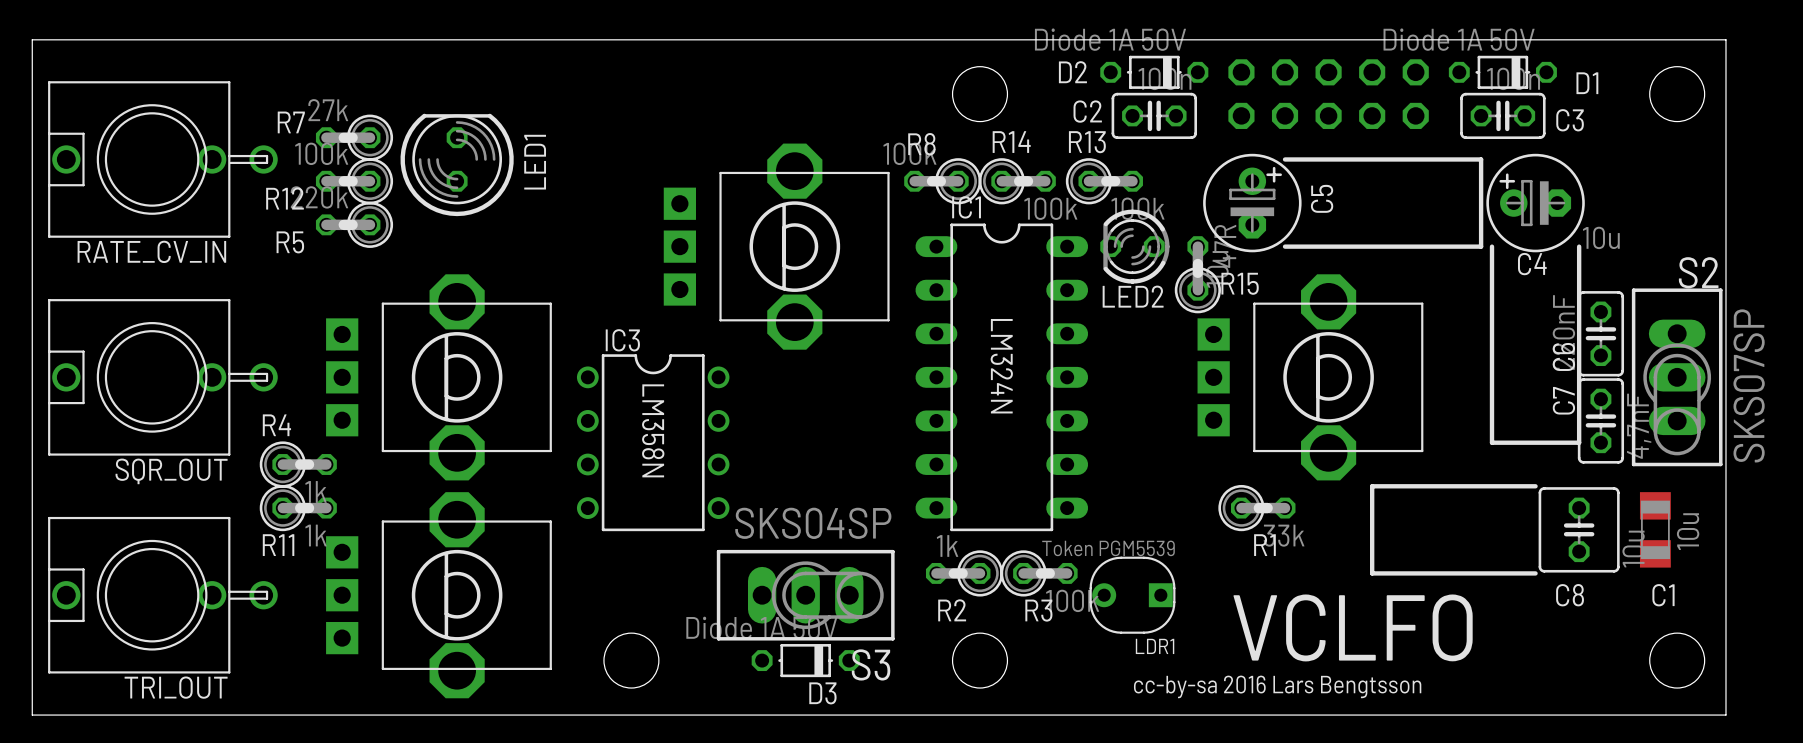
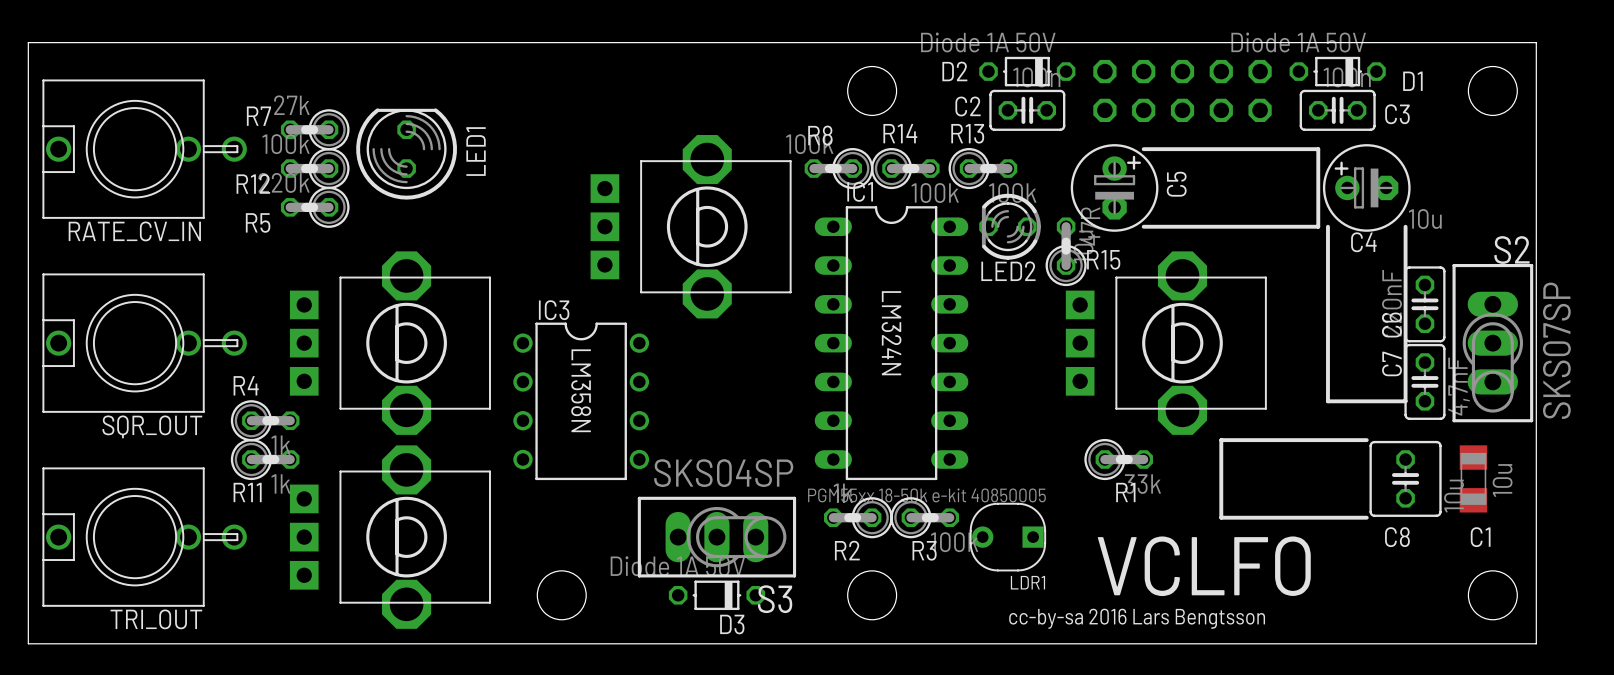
LDR1 value: Token PGM5539 (1108, 548) -> PGM55xx 18-50k e-kit 40850005 (926, 495)

